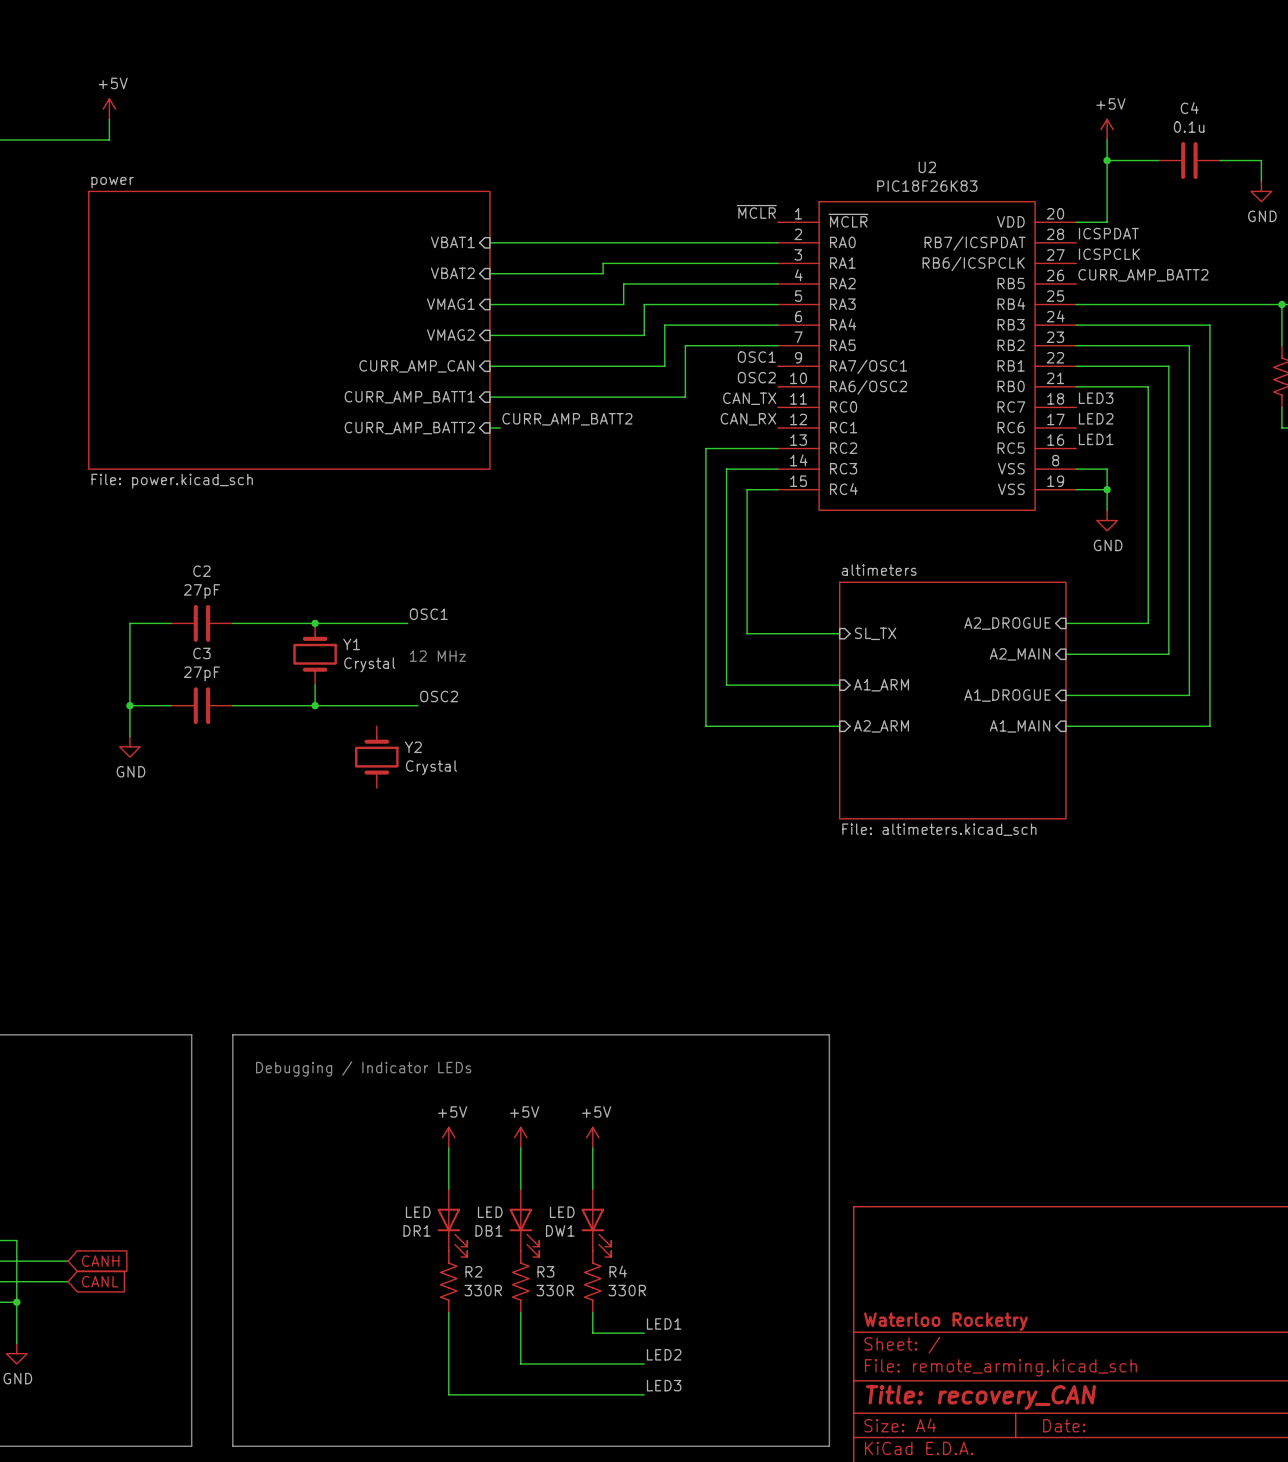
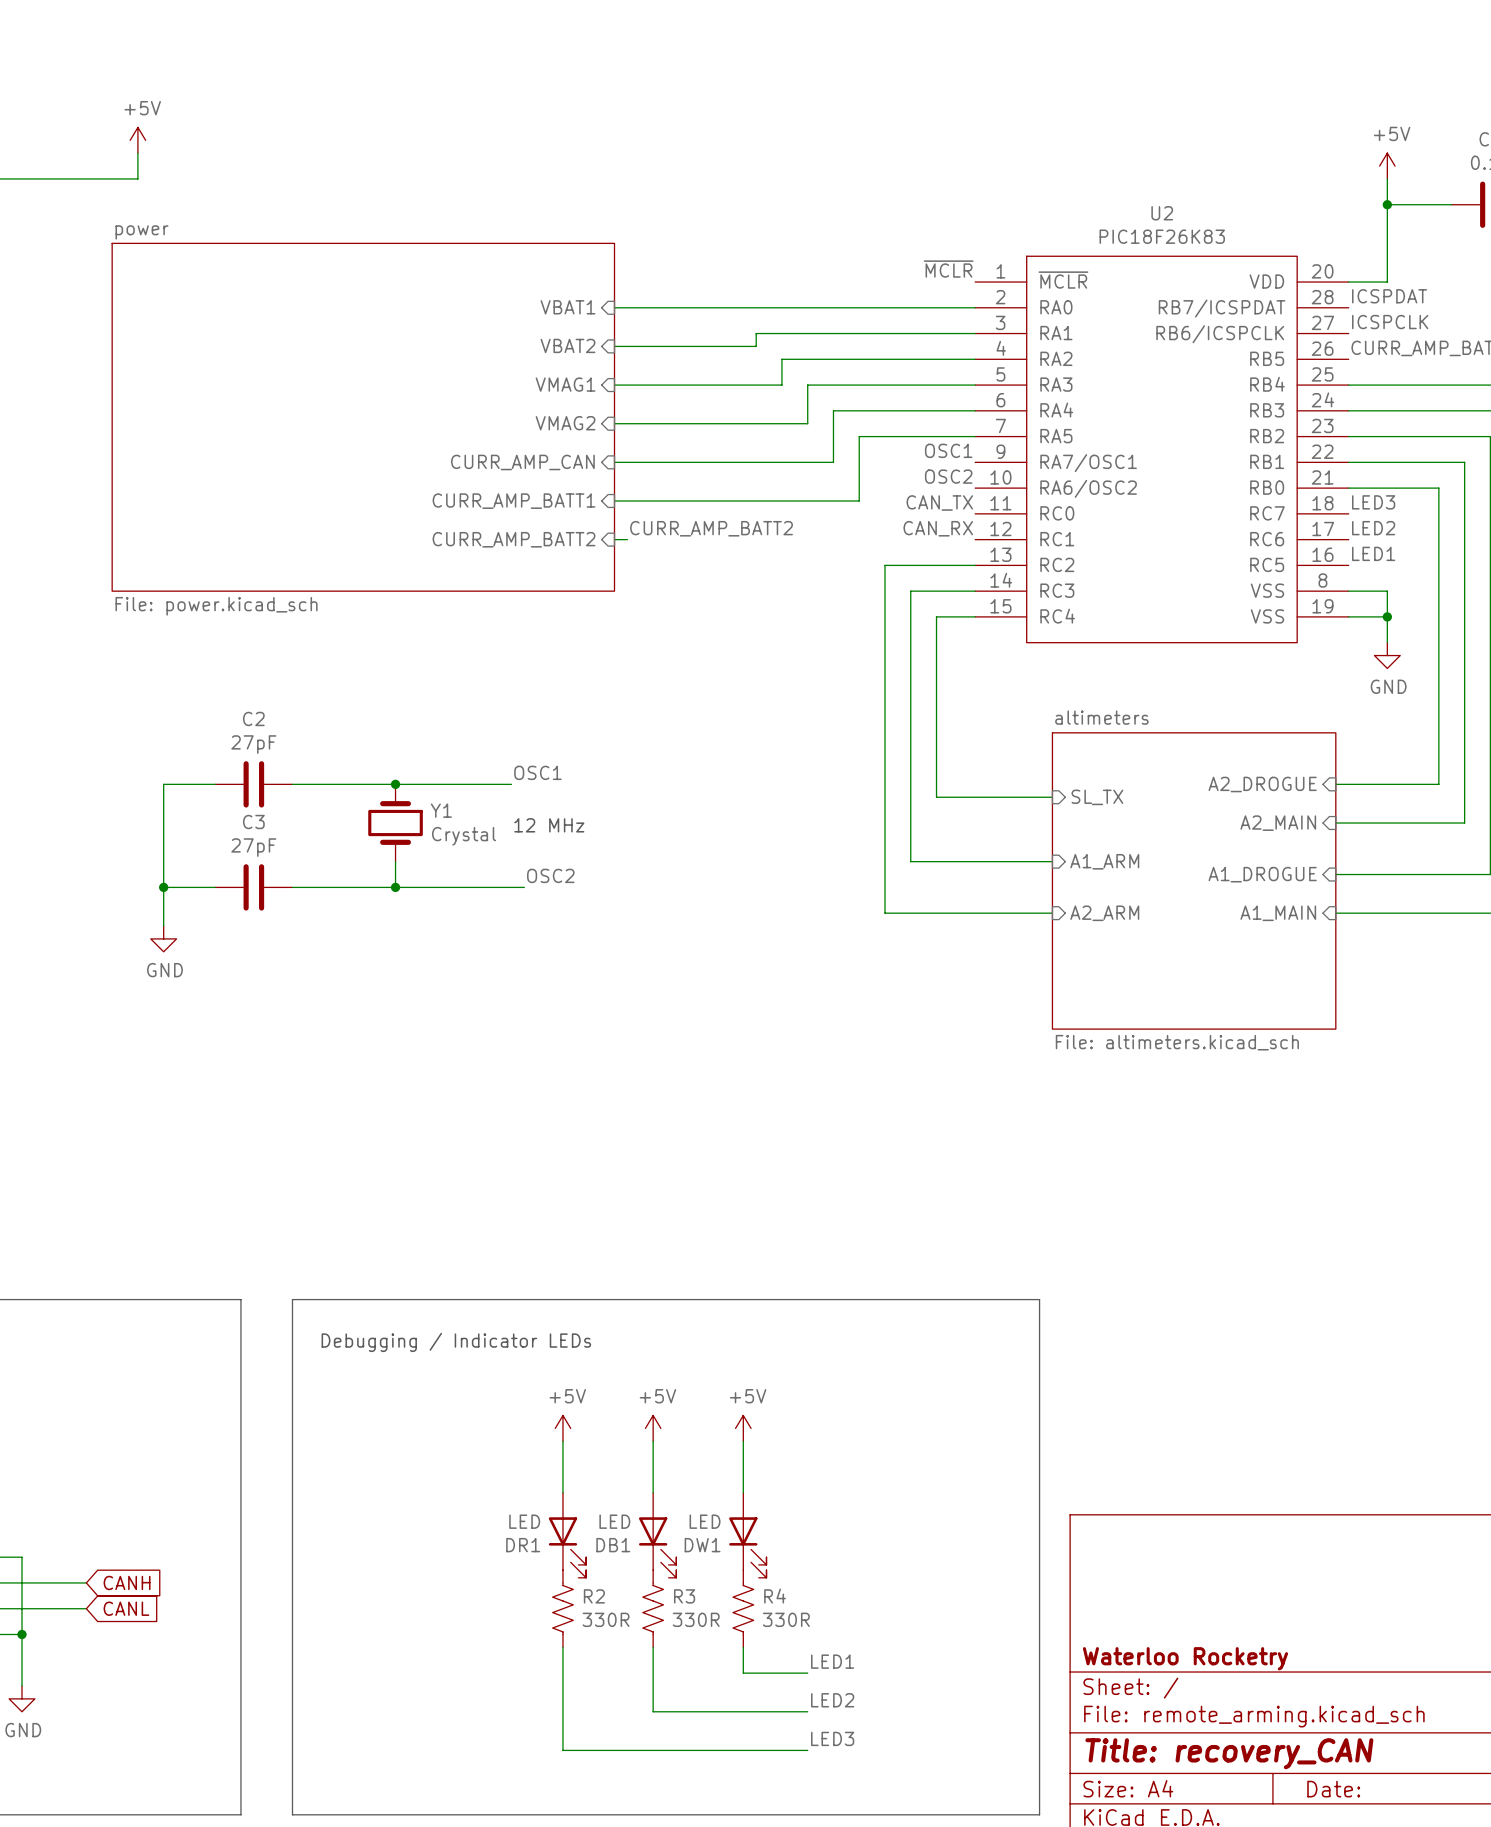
Y2: Crystal (376, 757) -> none

